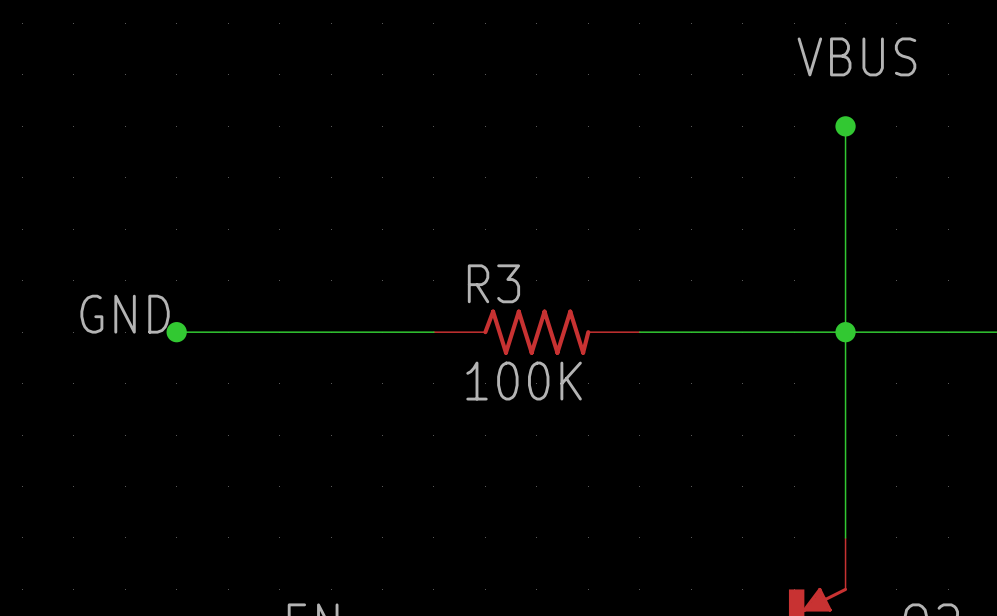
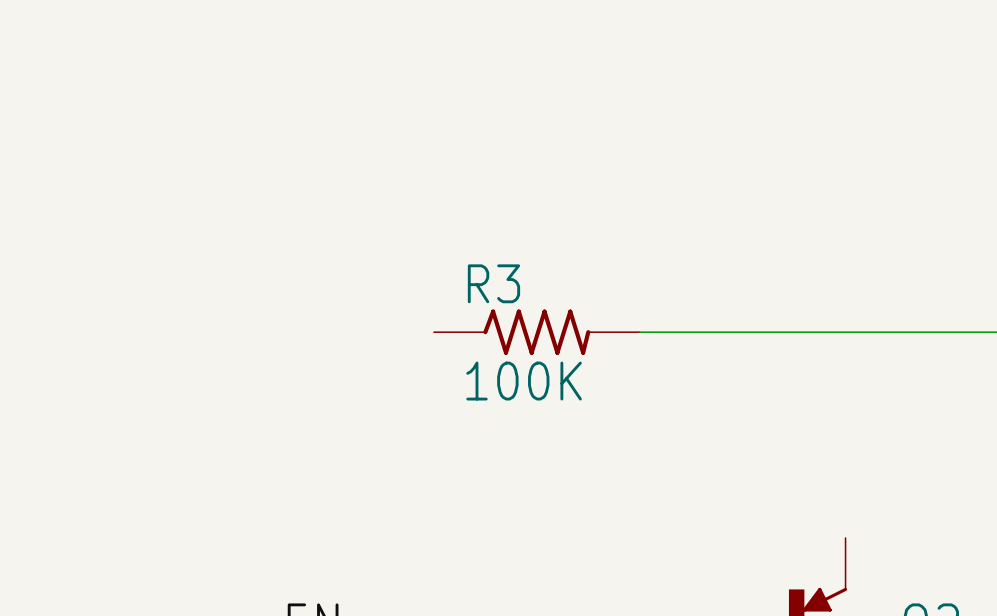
label: VBUS (856, 56) -> none
wire: (845, 126) (845, 537) -> none
junction: (845, 126) -> none
label: GND (125, 314) -> none
wire: (176, 332) (433, 332) -> none
junction: (176, 332) -> none
junction: (845, 332) -> none

